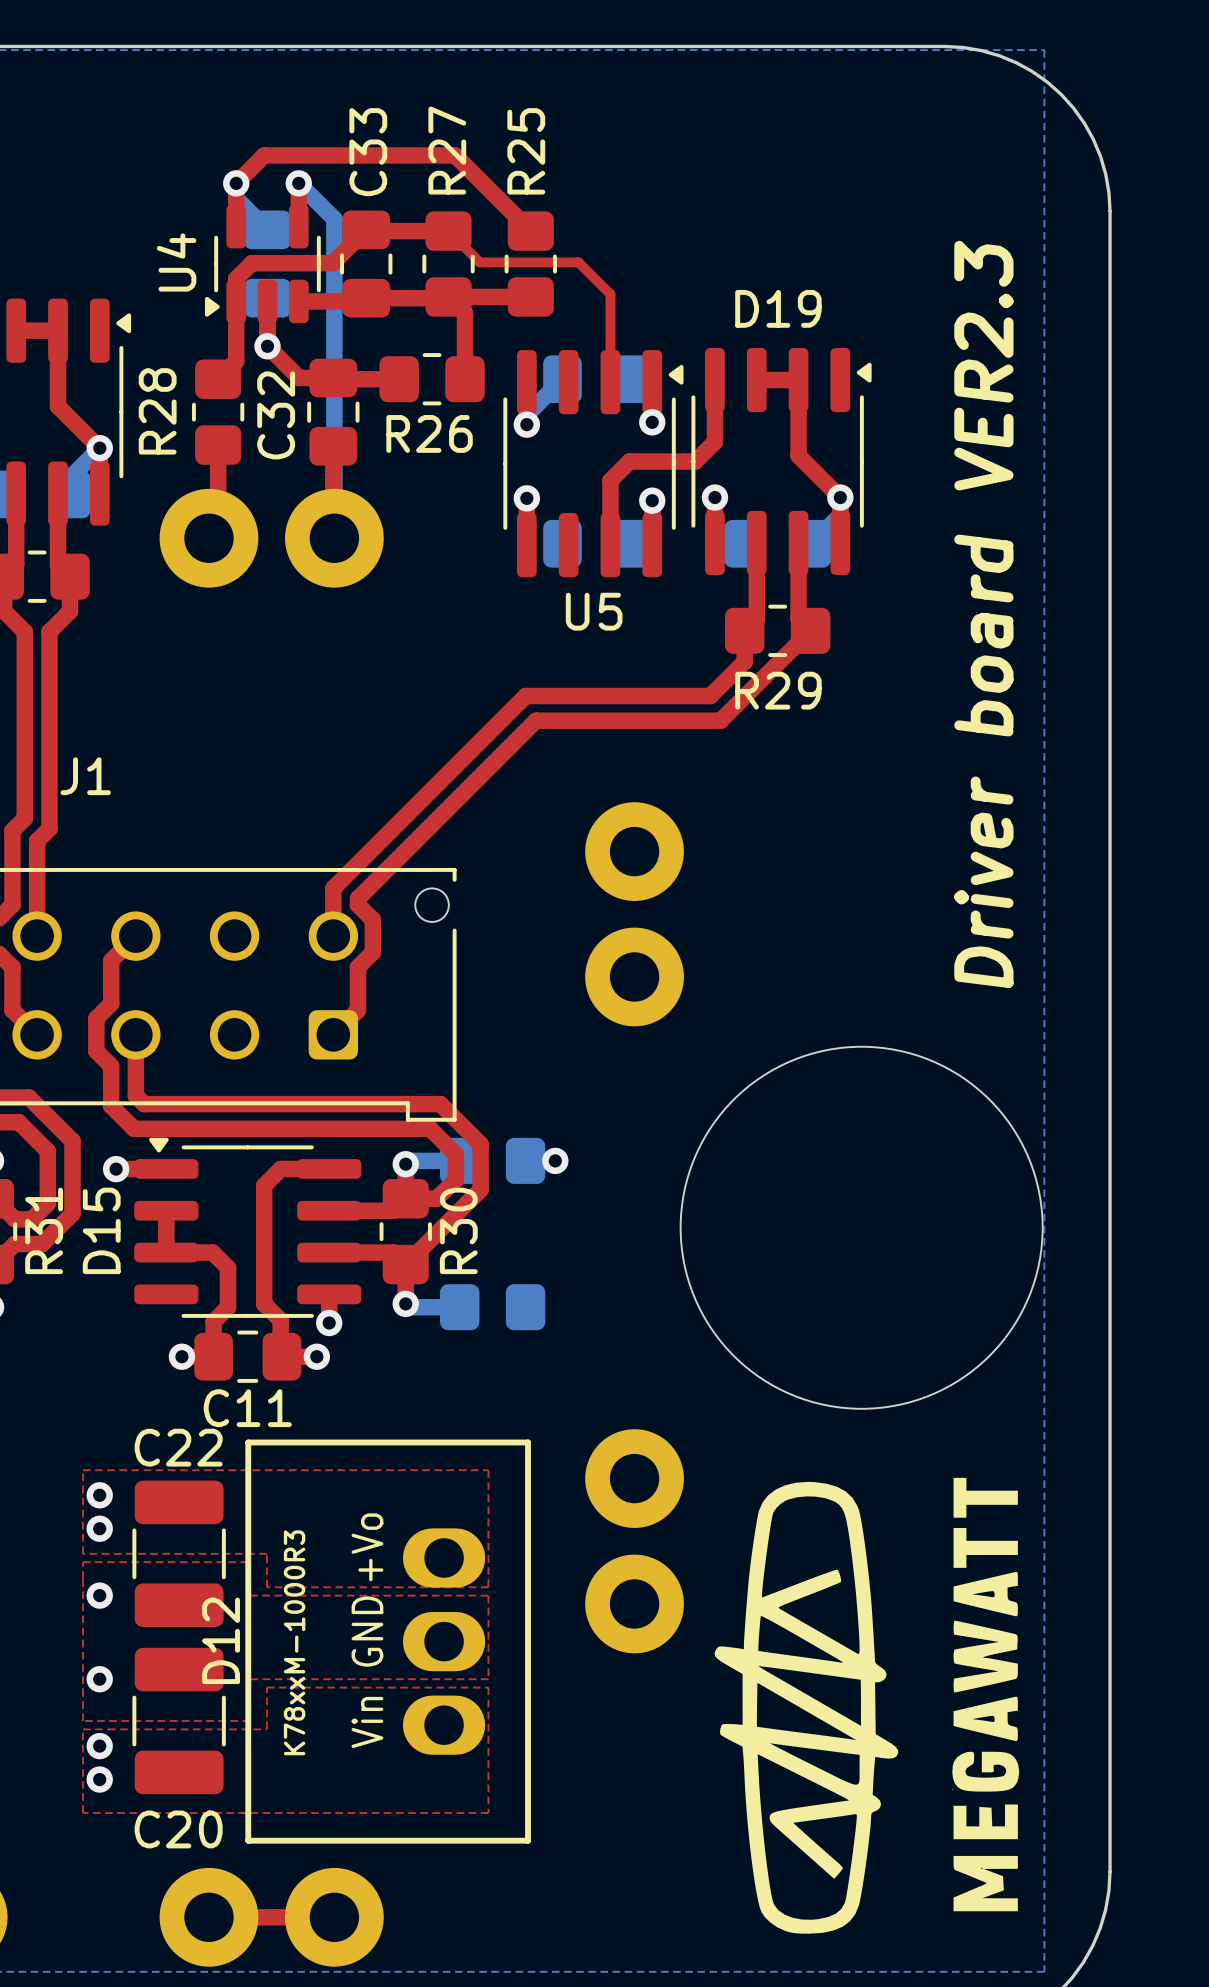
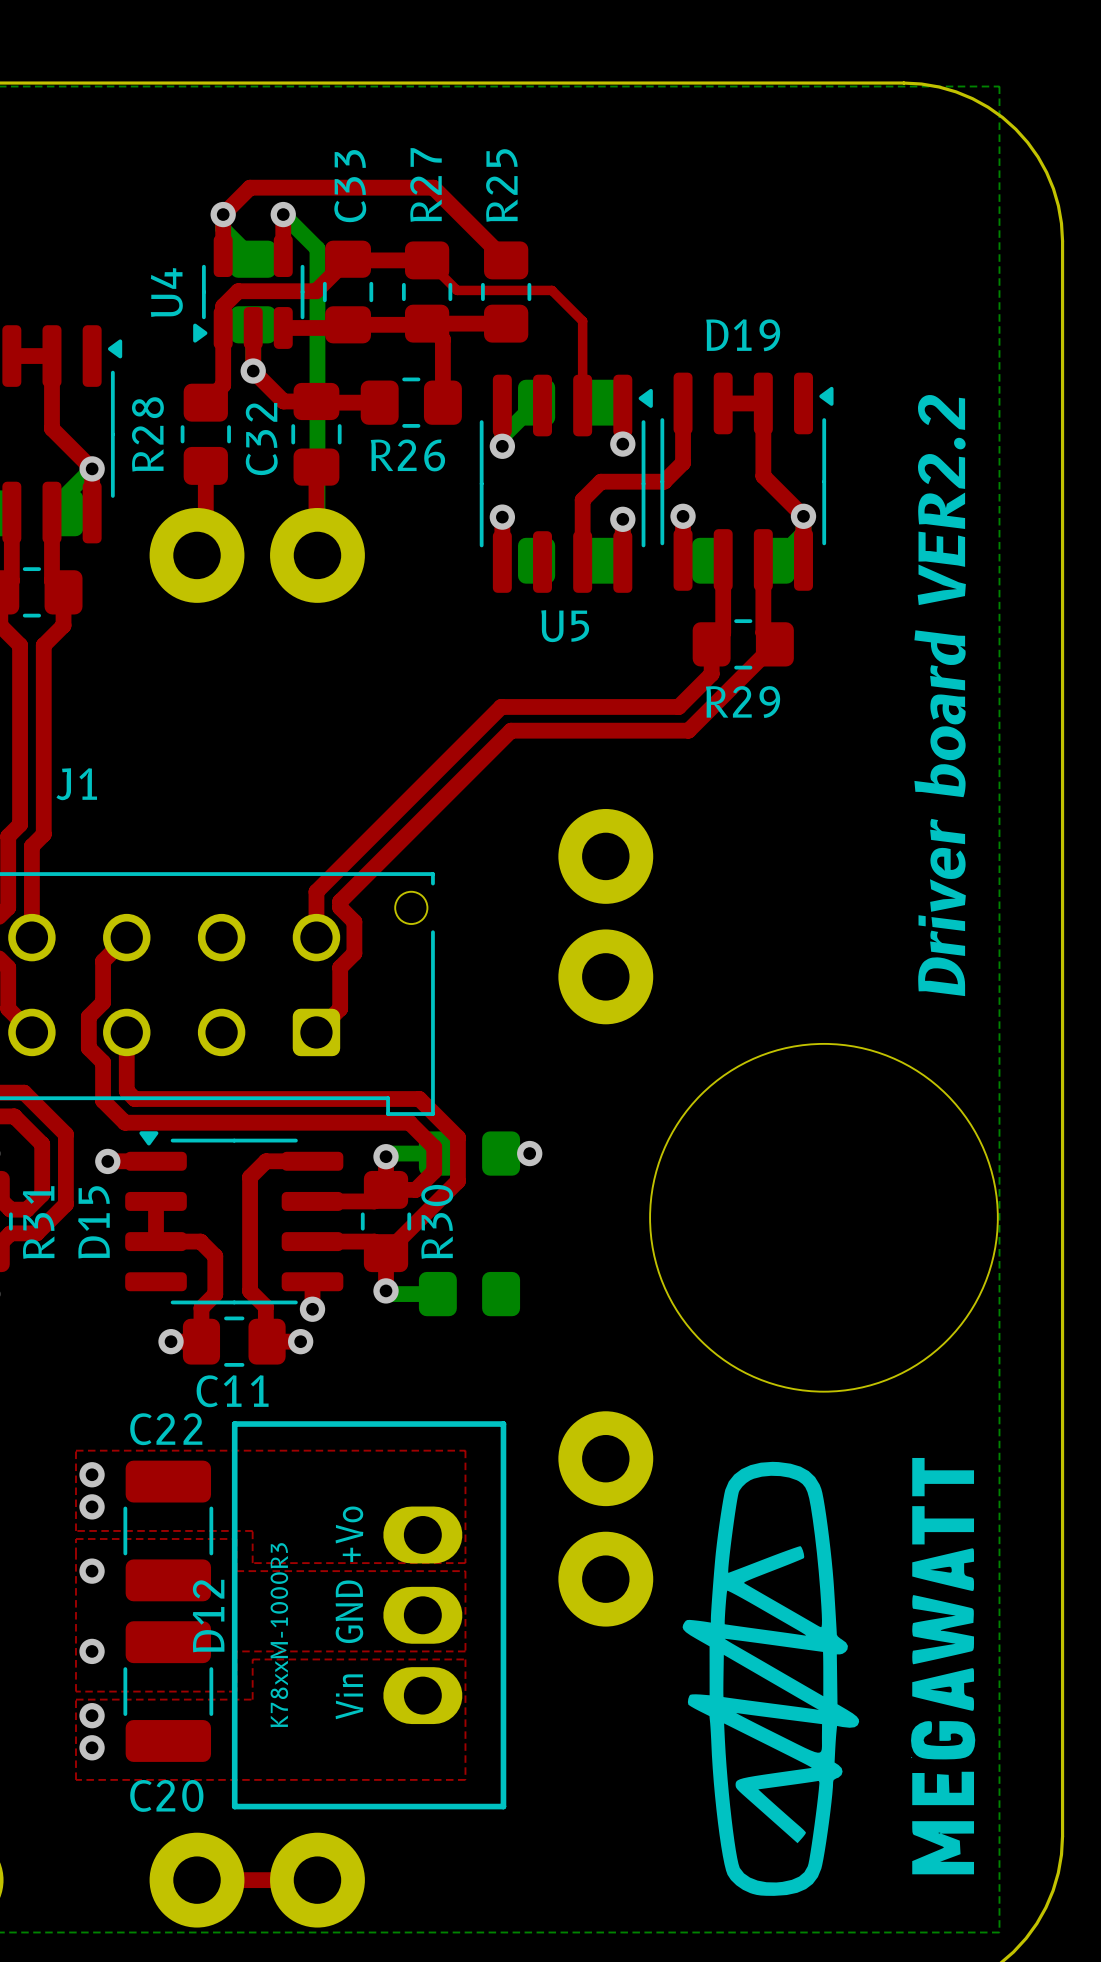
text: Driver board VER2.3 (983, 614) -> Driver board VER2.2 (940, 695)

